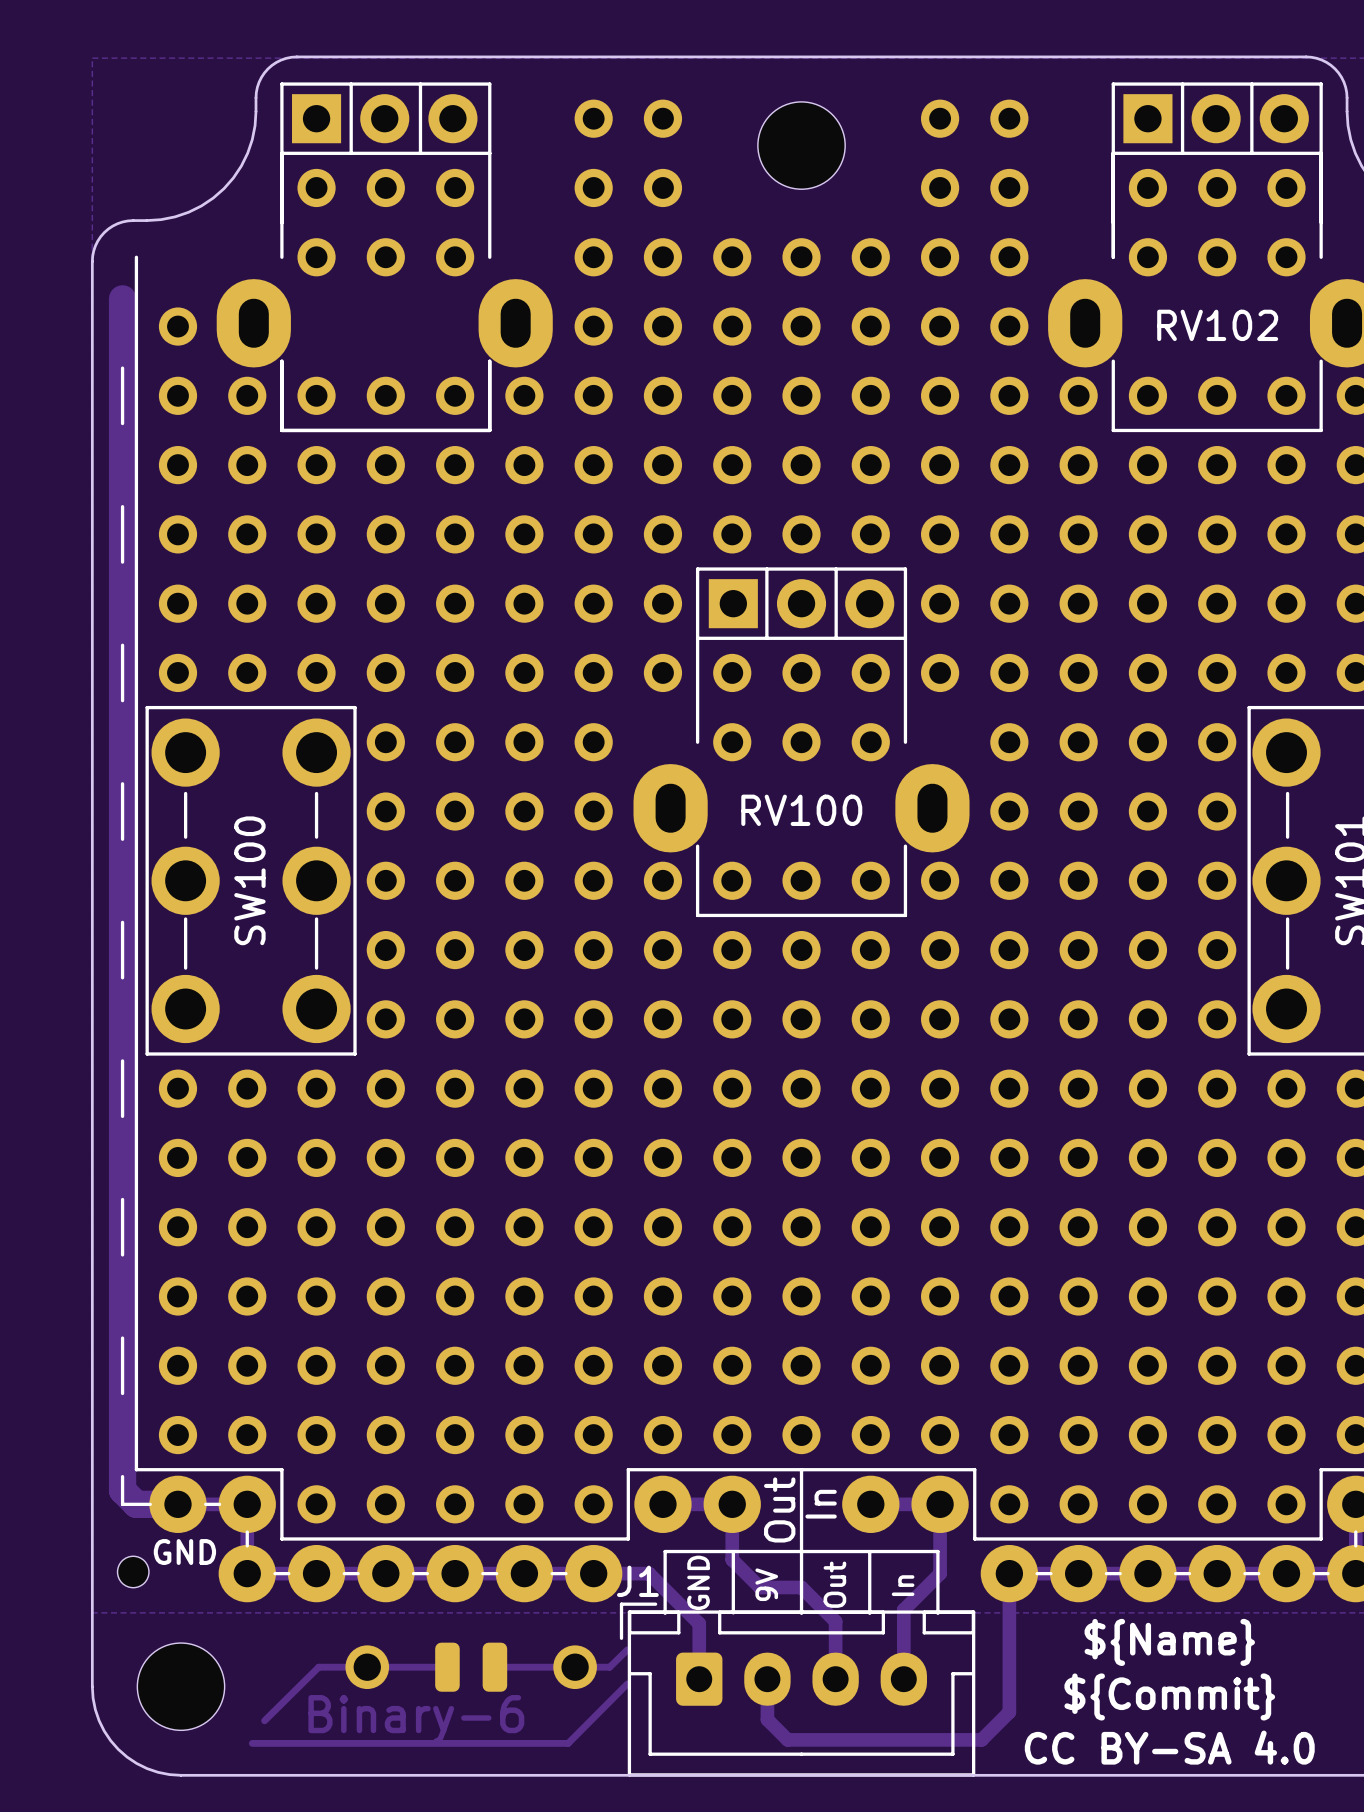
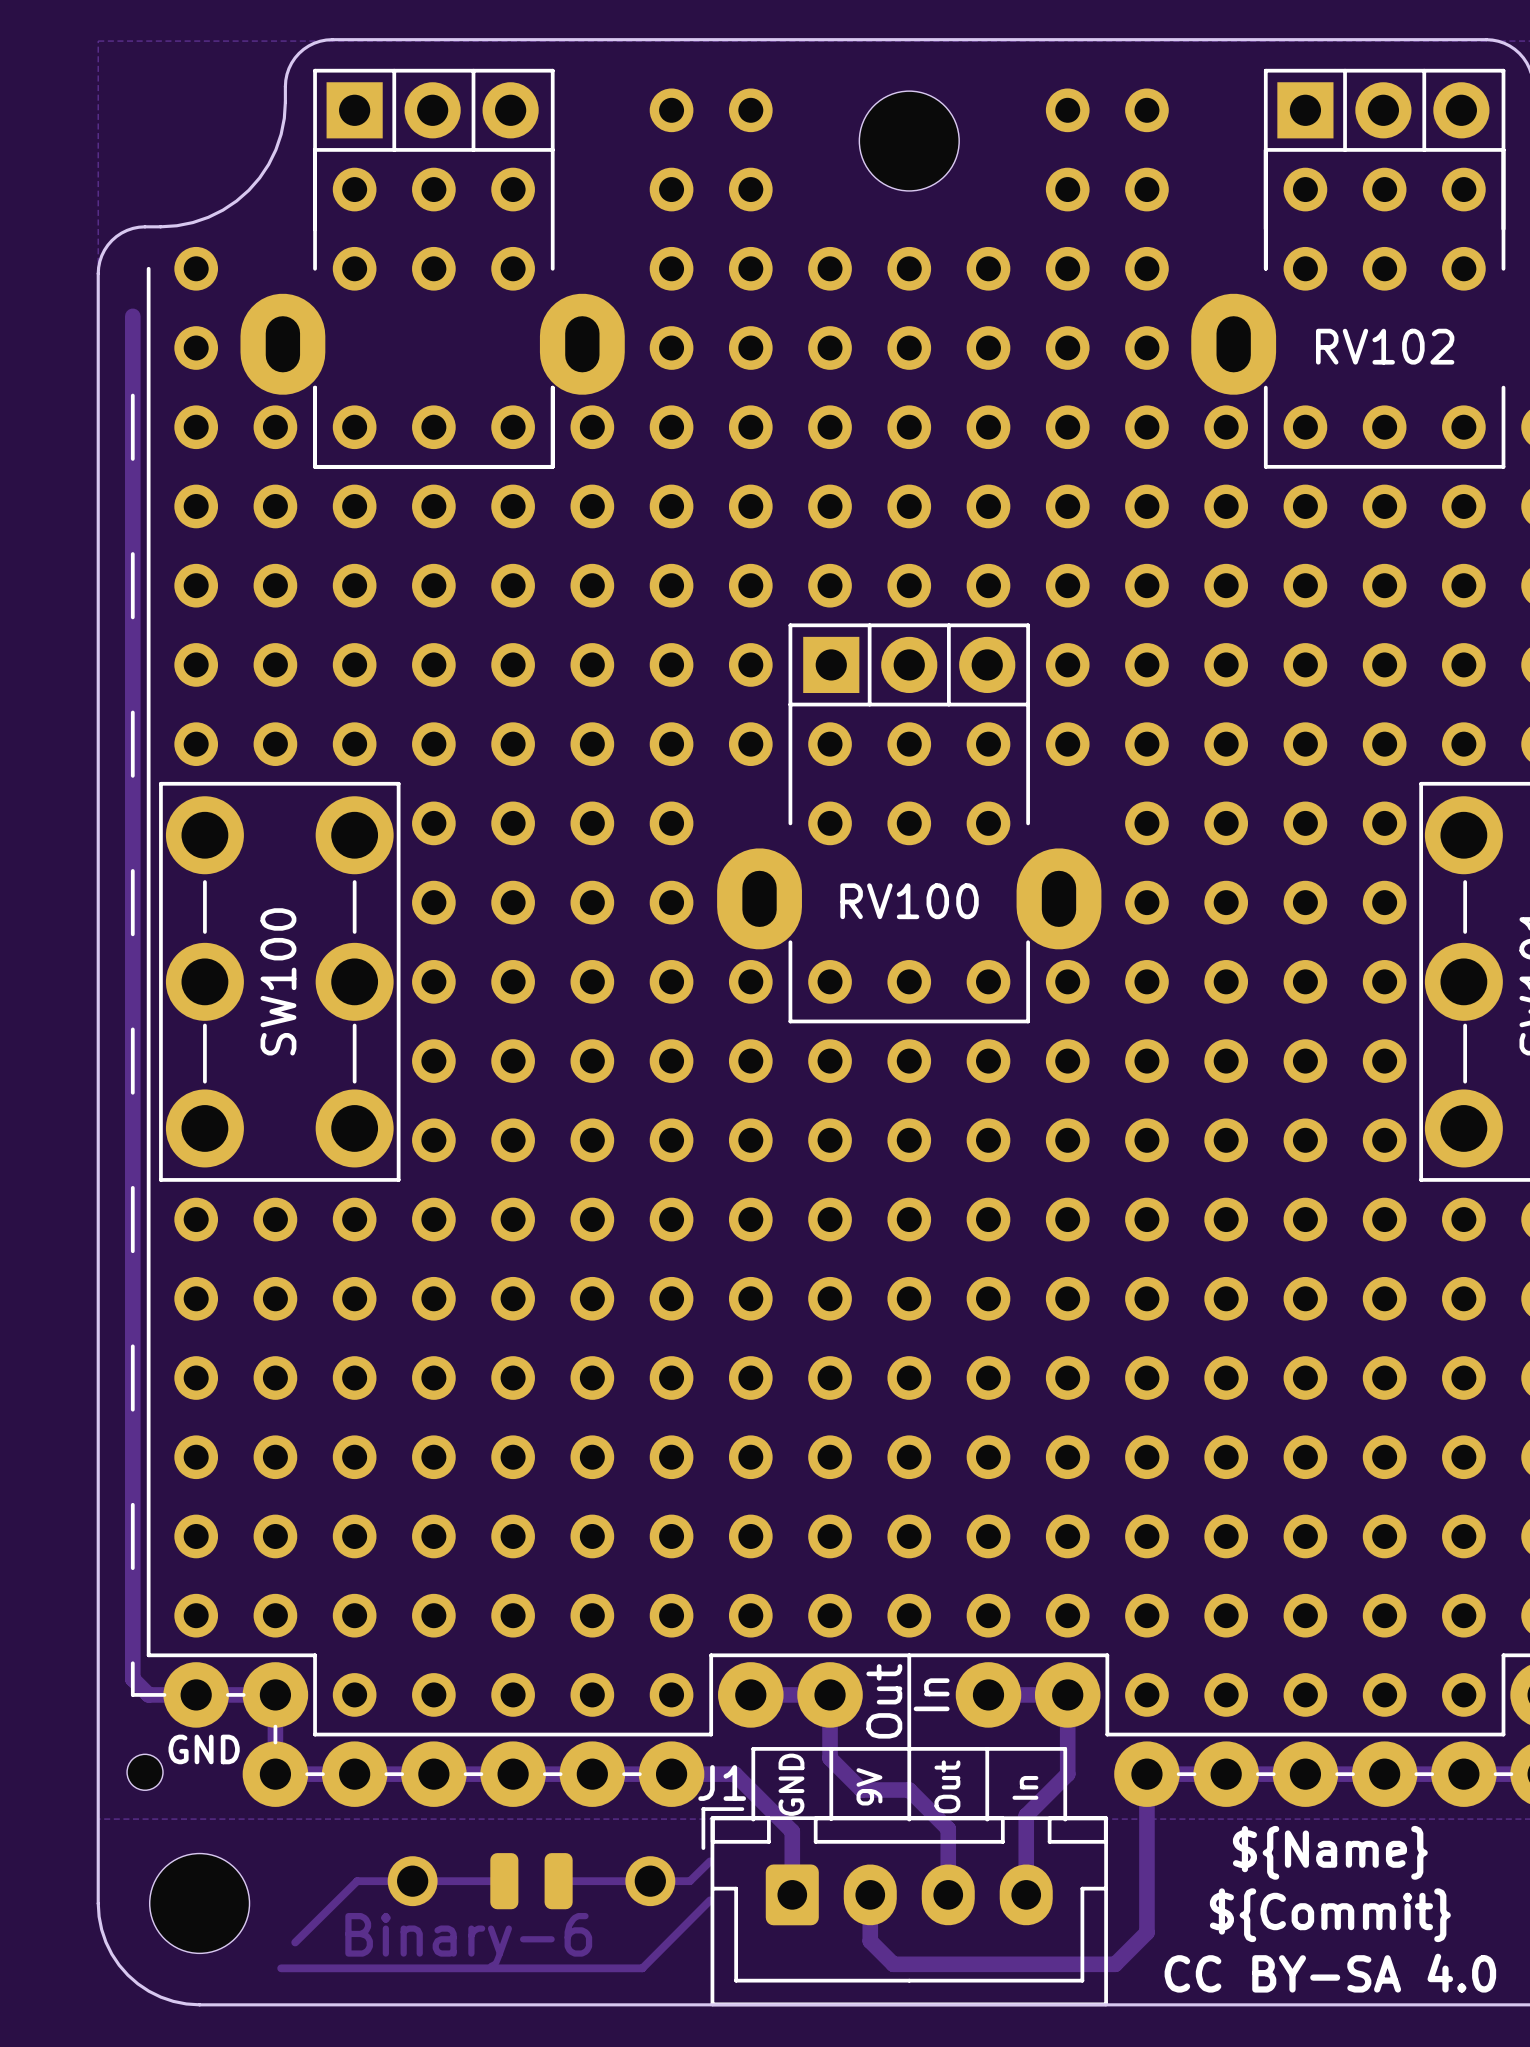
part: none -> (196, 268)
track width: thick (122, 298) (122, 1490) (136, 1504) (177, 1504) -> thin (132, 316) (132, 1679) (148, 1694) (196, 1694)

